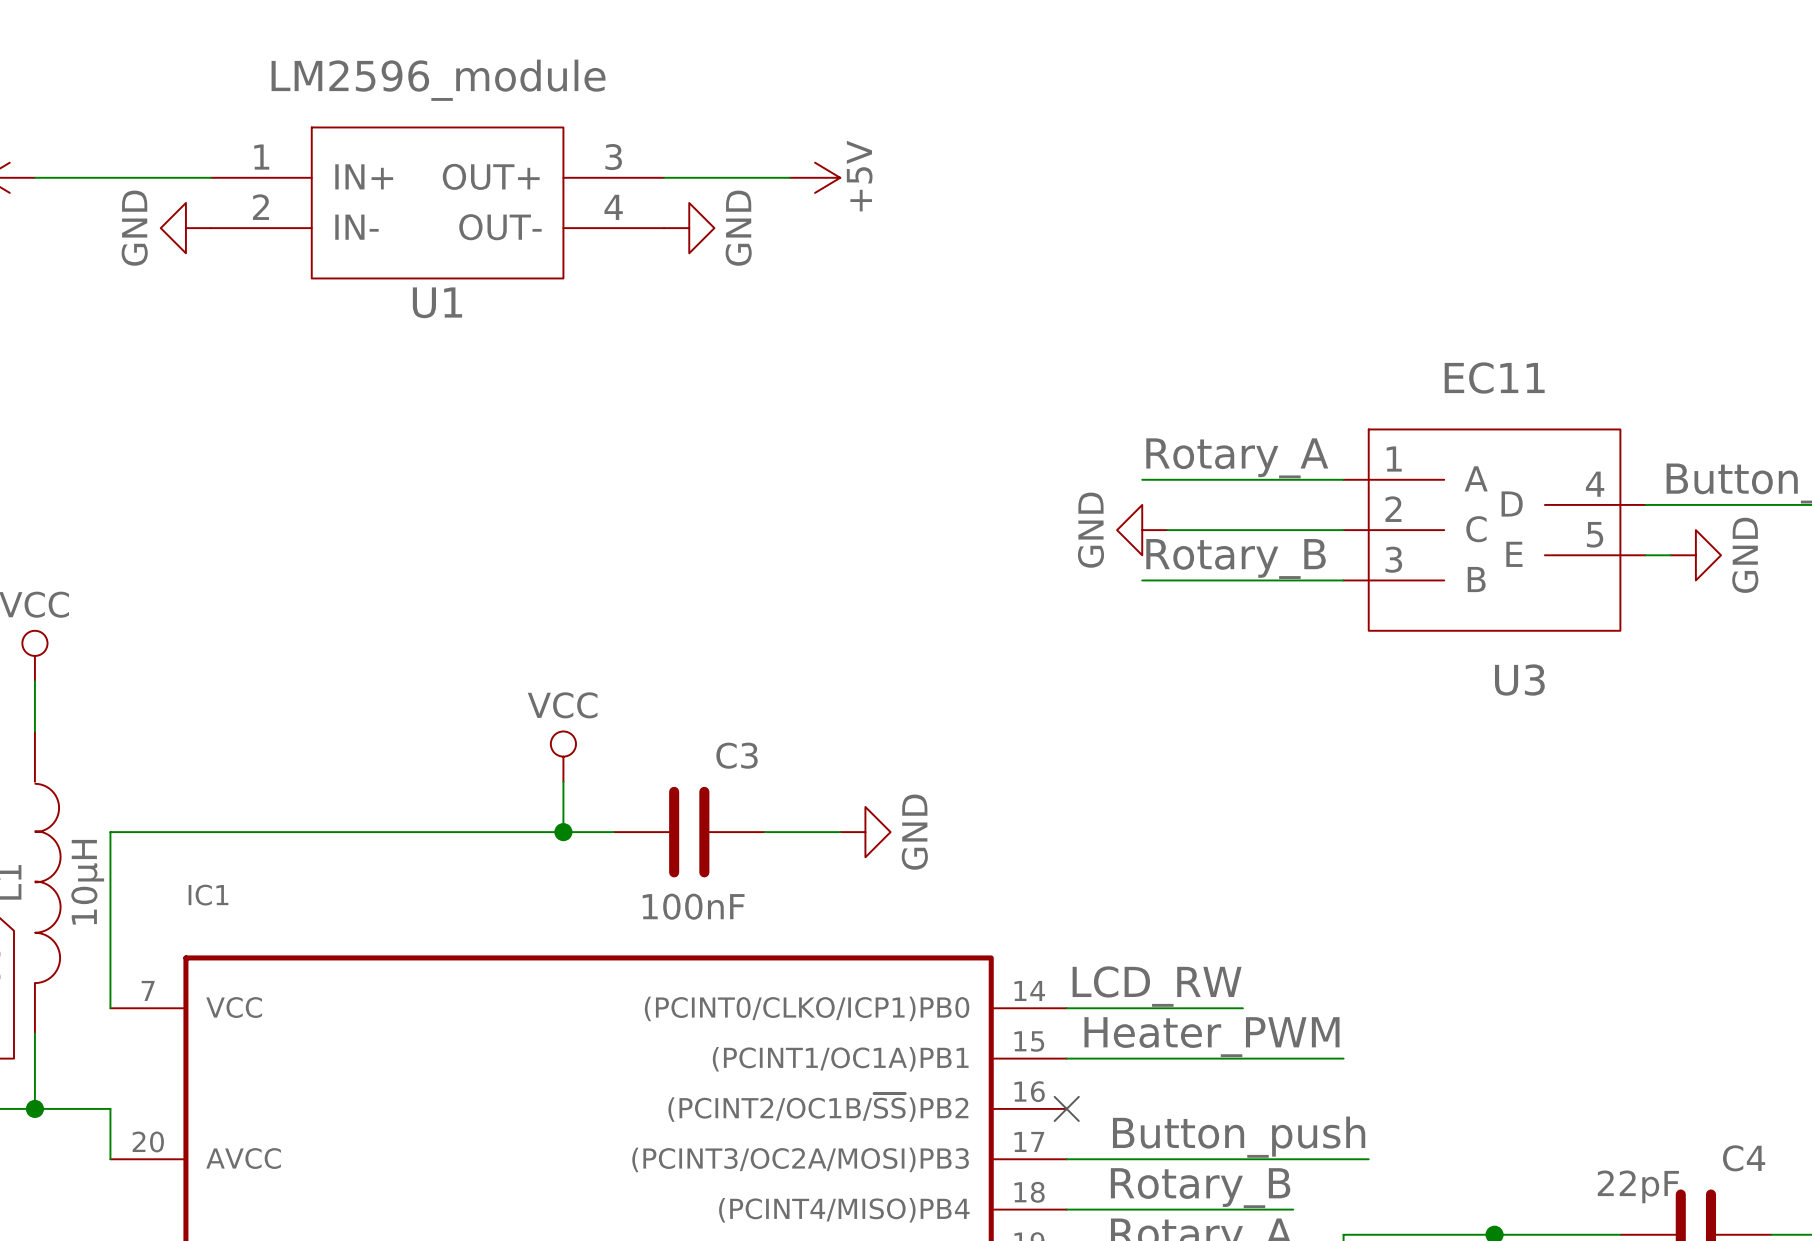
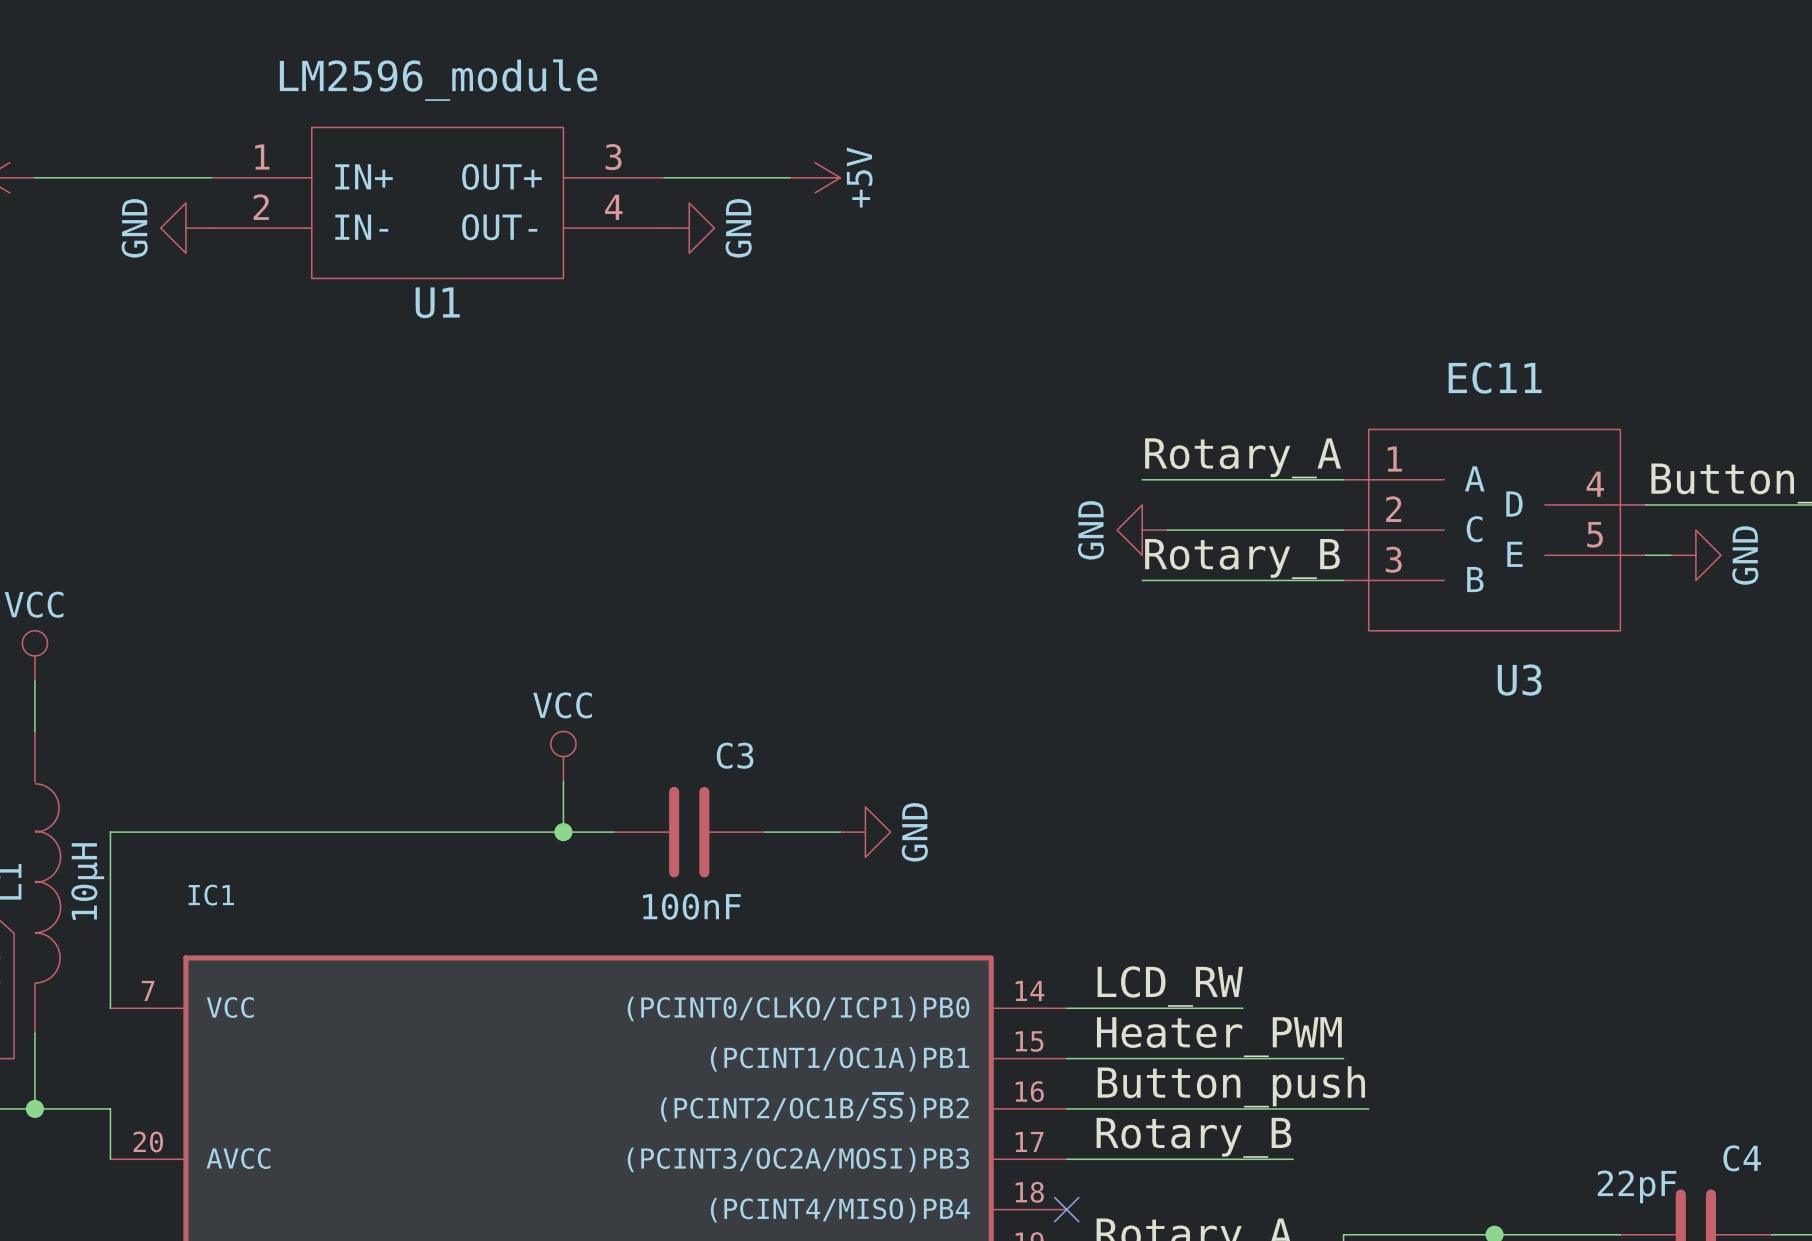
wire: none -> (1066, 1108) (1368, 1108)
no-connect mark position: (1066, 1108) -> (1066, 1209)
label position: Button_push (1239, 1137) -> Button_push (1231, 1086)
wire: (1293, 1159) (1368, 1159) -> none
label position: Rotary_B (1200, 1188) -> Rotary_B (1193, 1137)
wire: (1066, 1209) (1293, 1209) -> none

